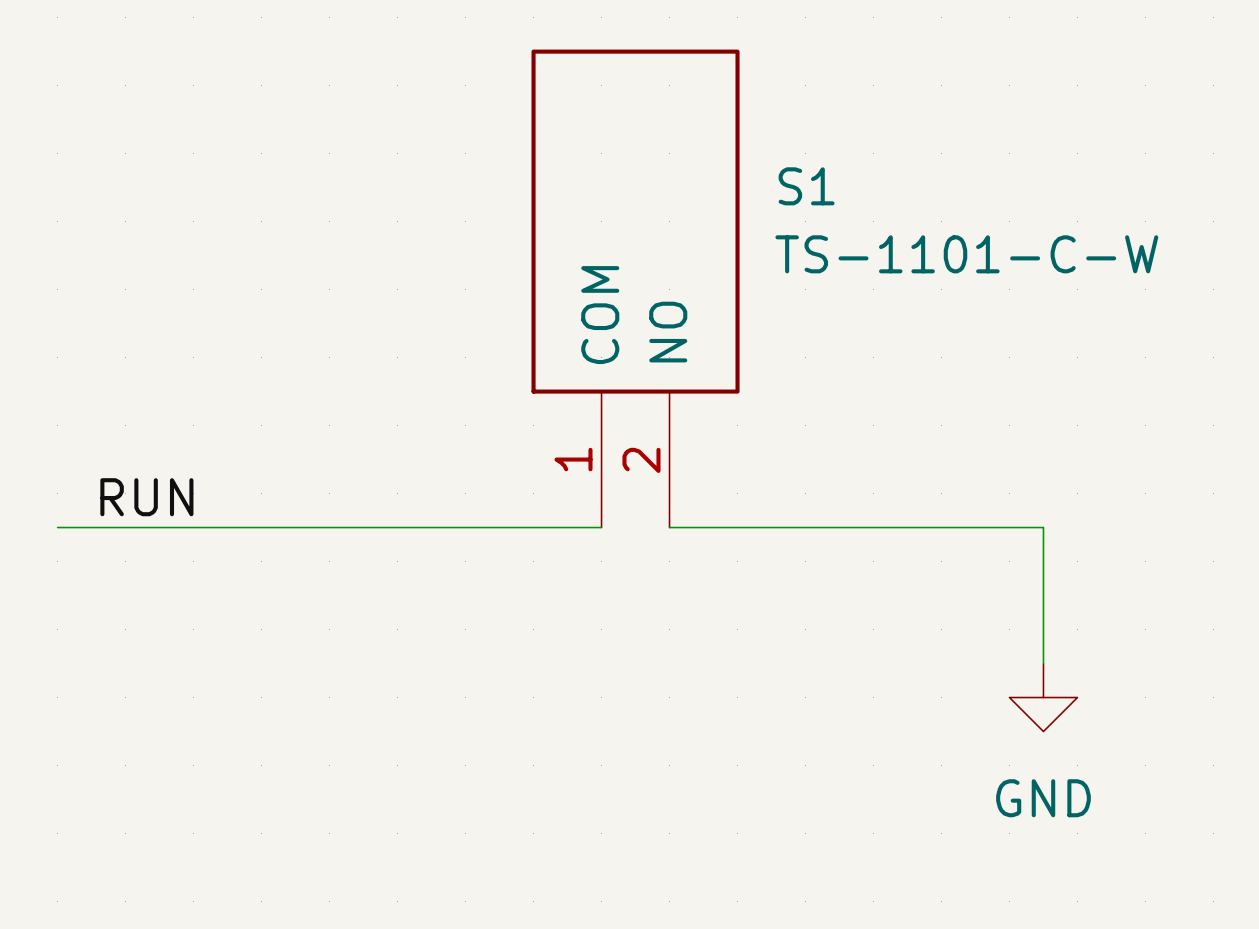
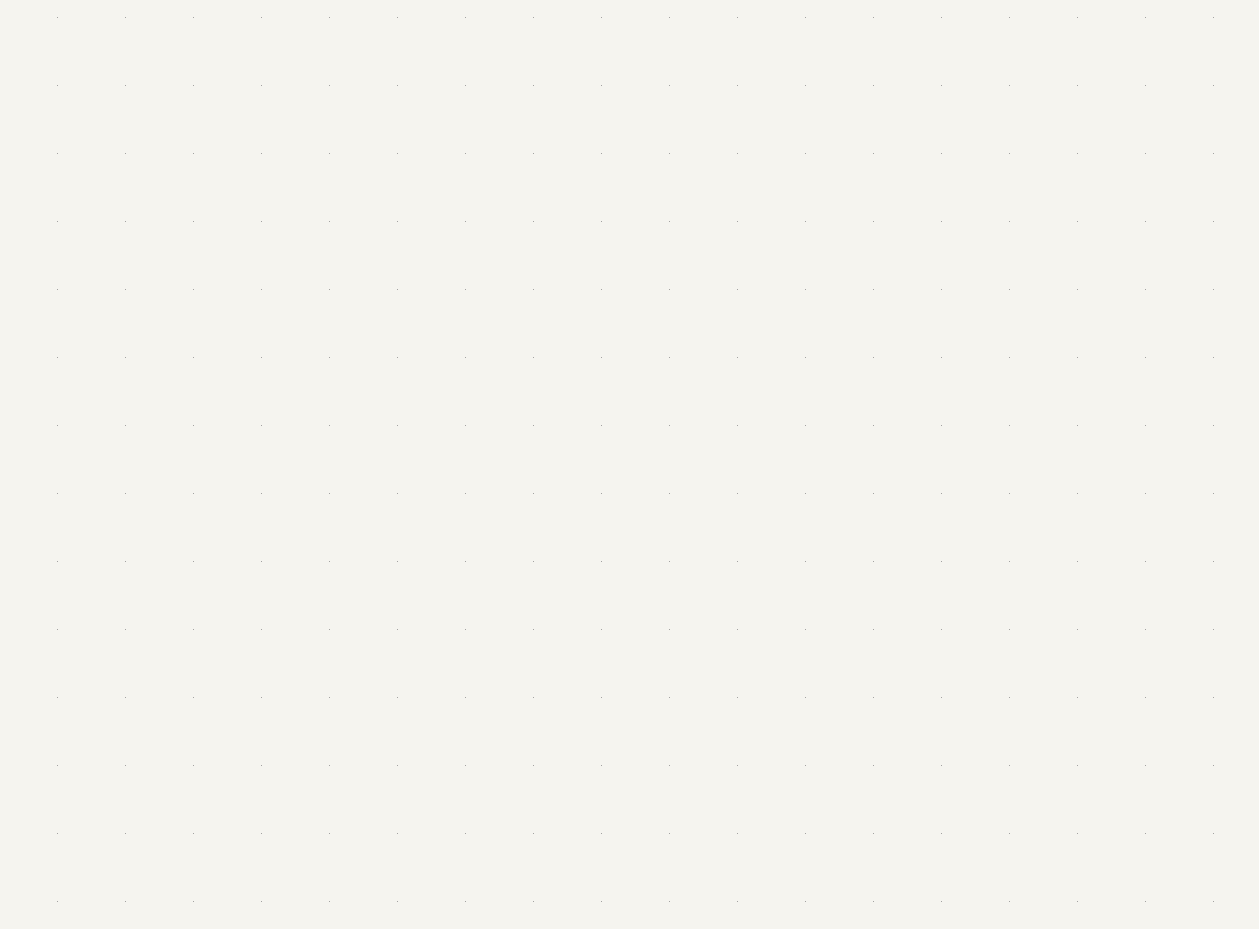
S1: TS-1101-C-W (635, 288) -> none
label: RUN (146, 497) -> none
wire: (57, 527) (601, 527) -> none
wire: (669, 527) (1043, 527) (1043, 663) -> none
power symbol: GND (1043, 697) -> none

